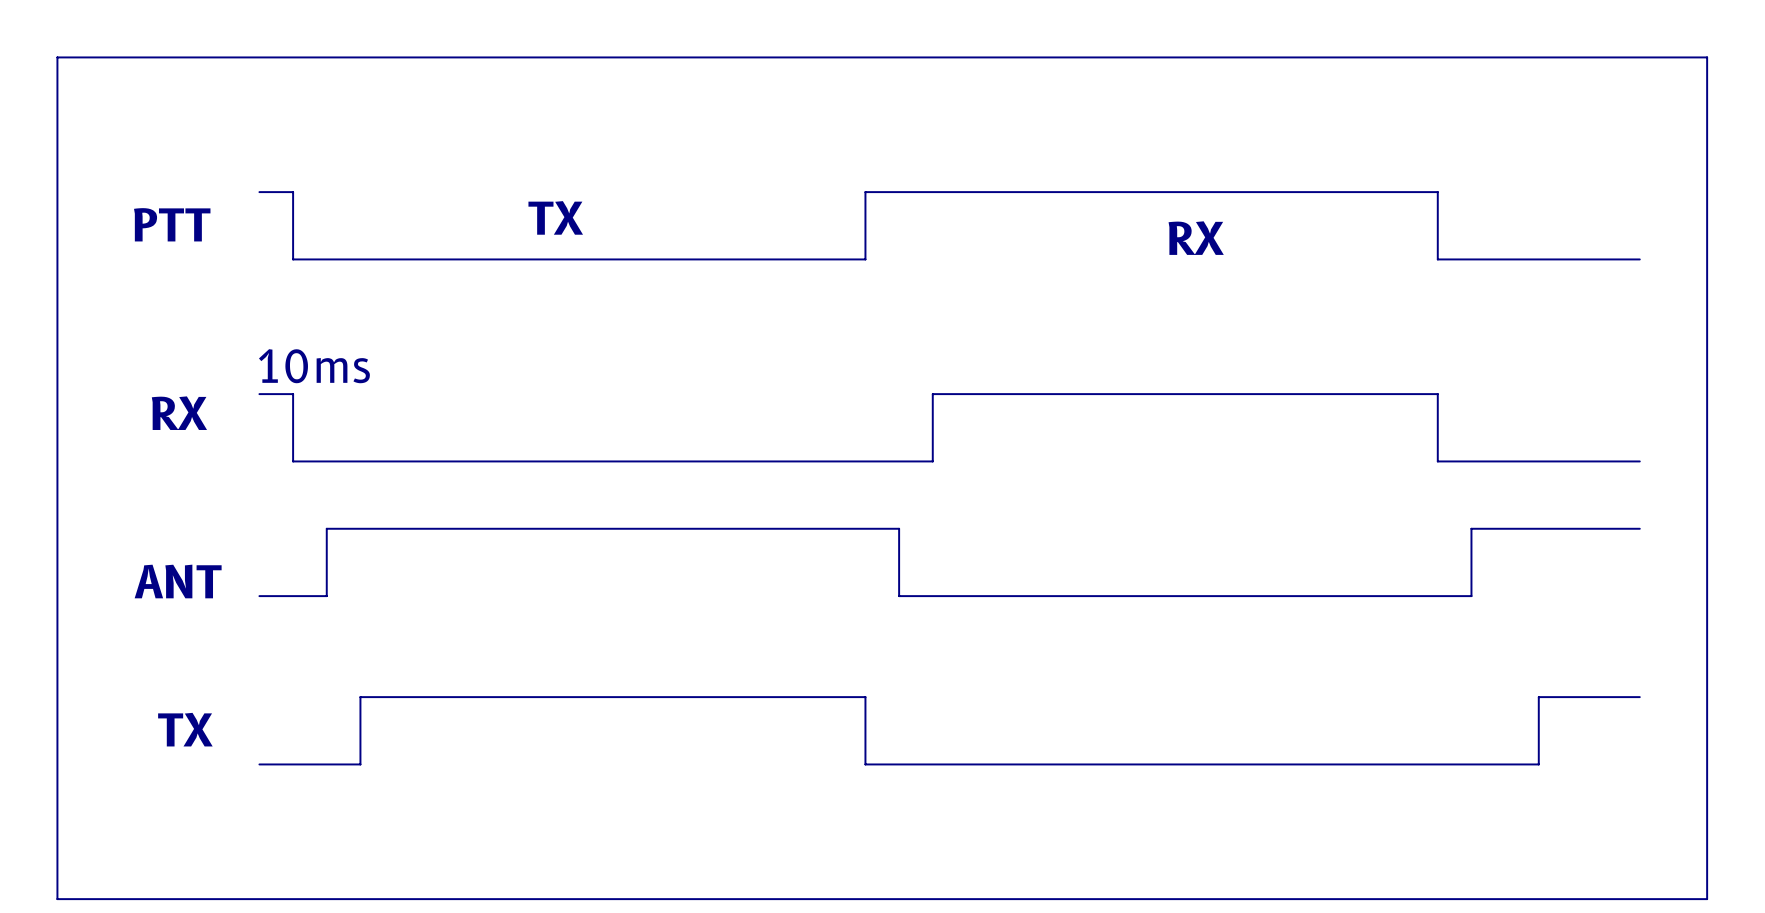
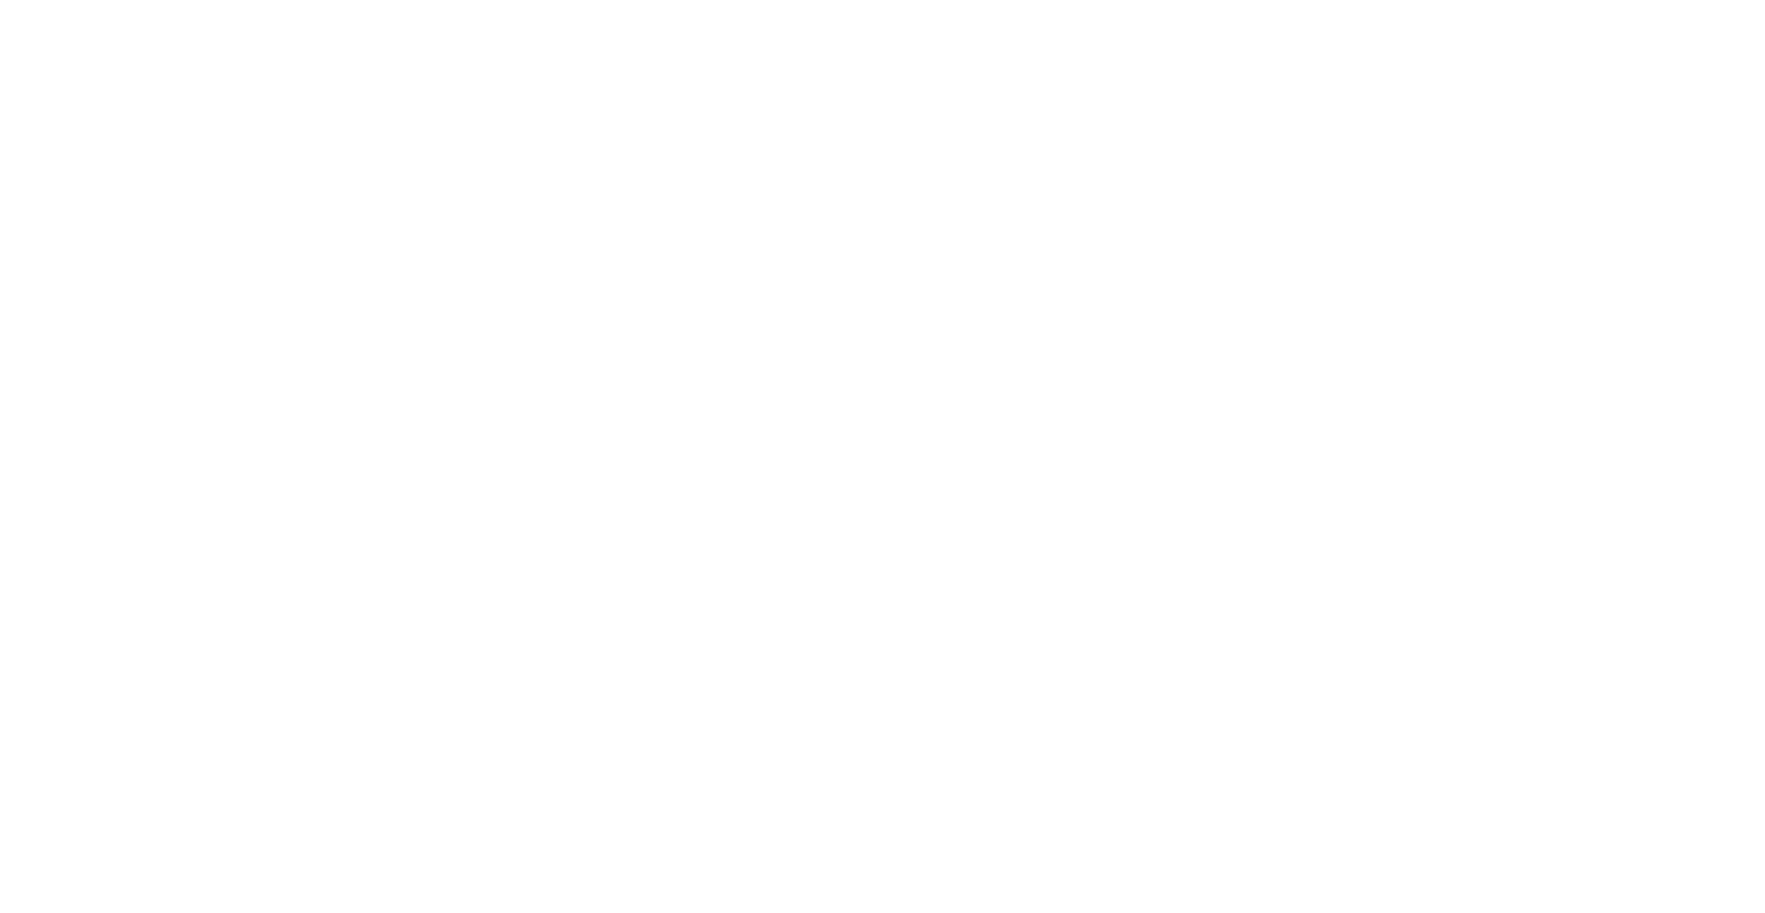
line: (57, 57) (1707, 57) (1707, 899) (57, 899) (57, 57) -> none
line: (259, 192) (293, 192) (293, 259) (865, 259) (865, 192) (1437, 192) (1437, 259) (1639, 259) -> none
text: TX (555, 217) -> none
text: PTT (172, 224) -> none
text: RX (1196, 238) -> none
text: 10ms (314, 366) -> none
line: (259, 394) (293, 394) (293, 461) (932, 461) (932, 394) (1437, 394) (1437, 461) (1639, 461) -> none
text: RX (179, 413) -> none
line: (1639, 528) (1471, 528) (1471, 596) (899, 596) (899, 528) (326, 528) (326, 596) (259, 596) -> none
text: ANT (178, 581) -> none
line: (1639, 697) (1538, 697) (1538, 764) (865, 764) (865, 697) (360, 697) (360, 764) (259, 764) -> none
text: TX (185, 729) -> none

